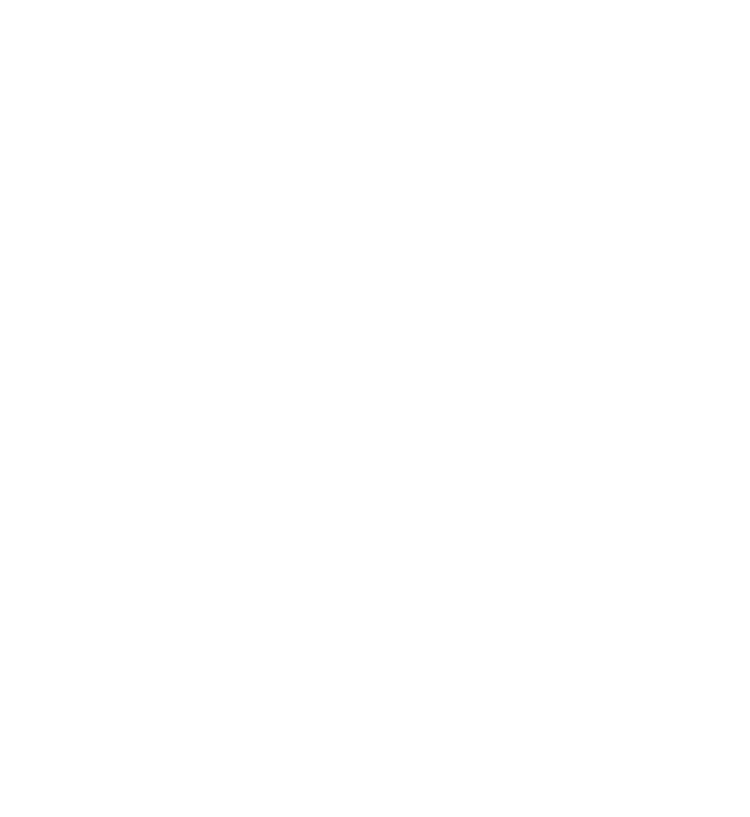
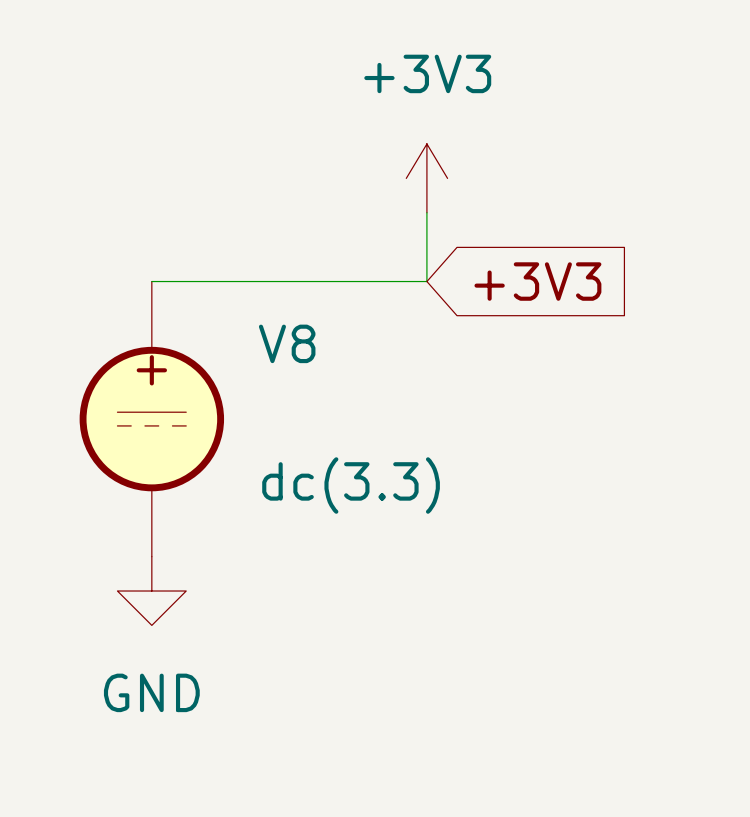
power symbol: none -> +3V3 (426, 178)
wire: none -> (426, 212) (426, 281) (151, 281)
global label: none -> +3V3 (537, 281)
V8: none -> (151, 419)
power symbol: none -> GND (151, 591)

